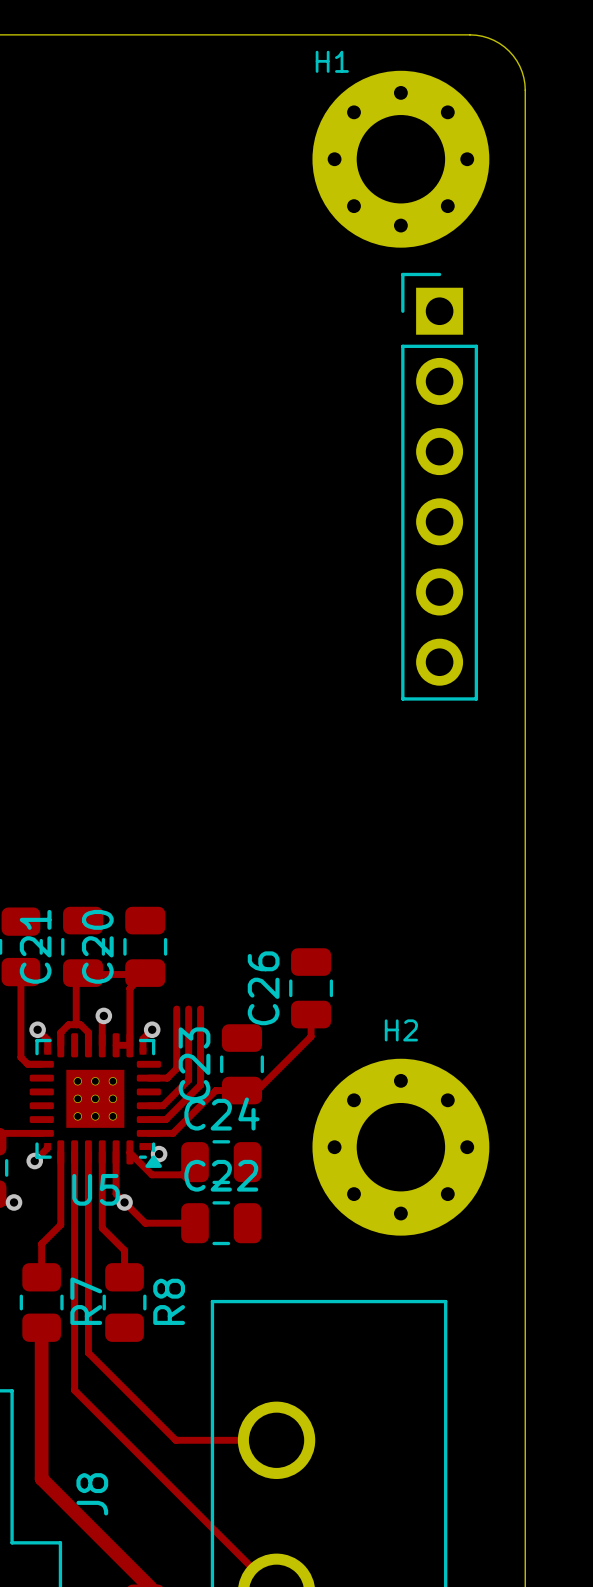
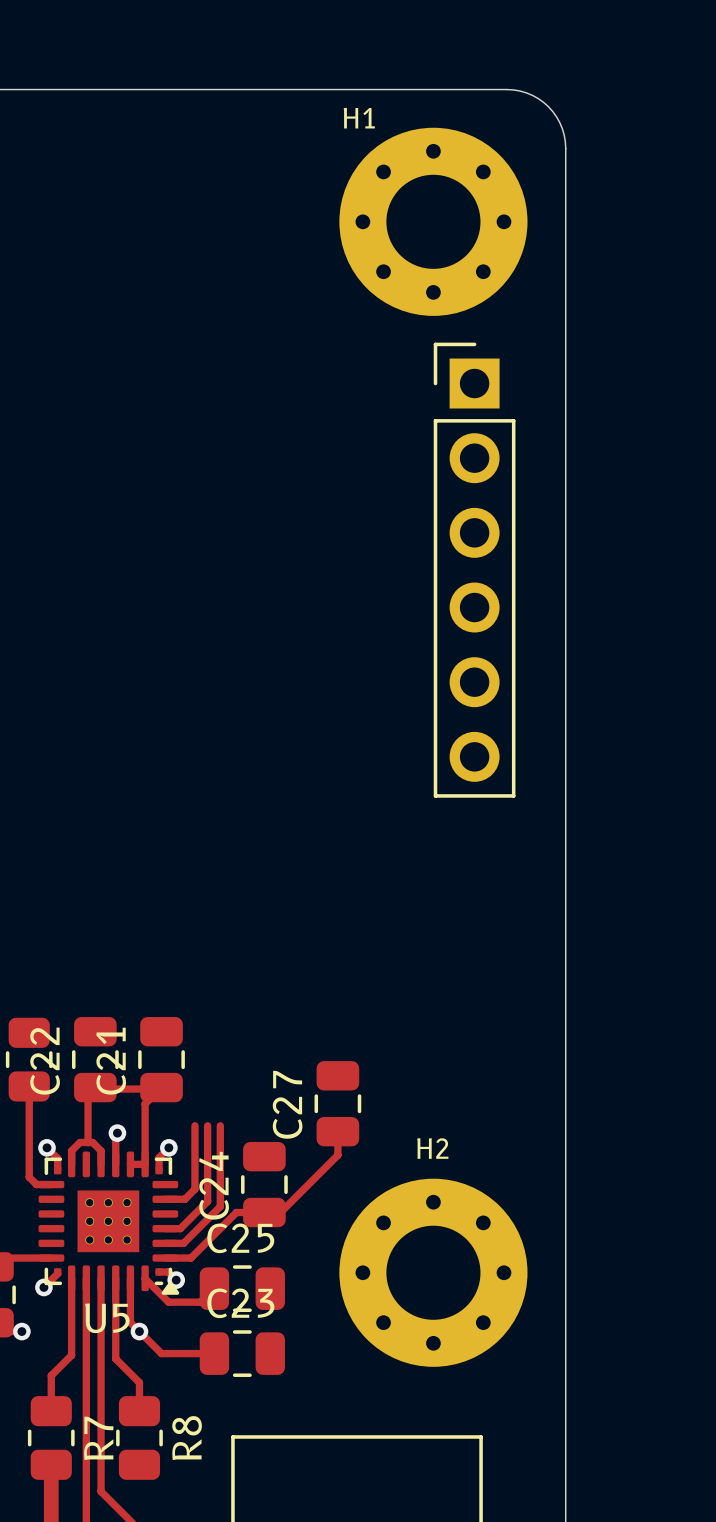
C21 name: C21 (35, 946) -> C22 (45, 1061)
C20 name: C20 (97, 946) -> C21 (111, 1061)
C26 name: C26 (263, 988) -> C27 (287, 1104)
C23 name: C23 (194, 1064) -> C24 (214, 1185)
C24 name: C24 (221, 1114) -> C25 (240, 1238)
C22 name: C22 (221, 1175) -> C23 (240, 1303)

